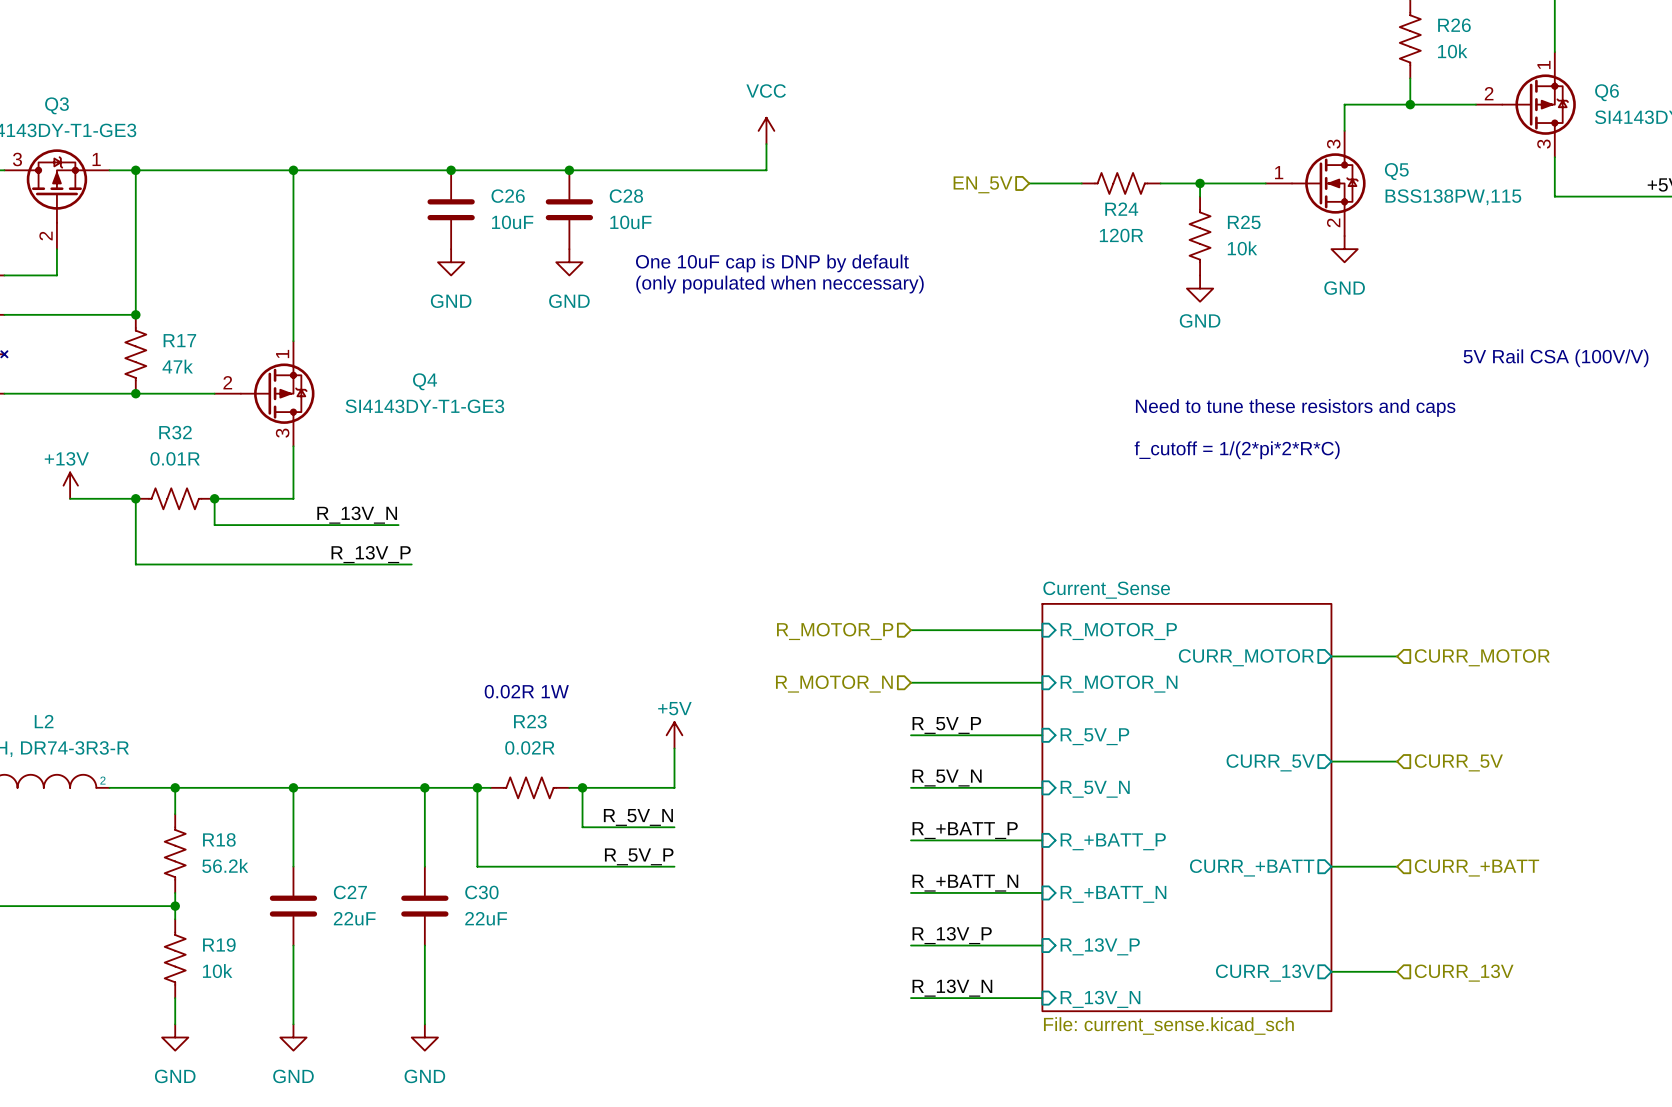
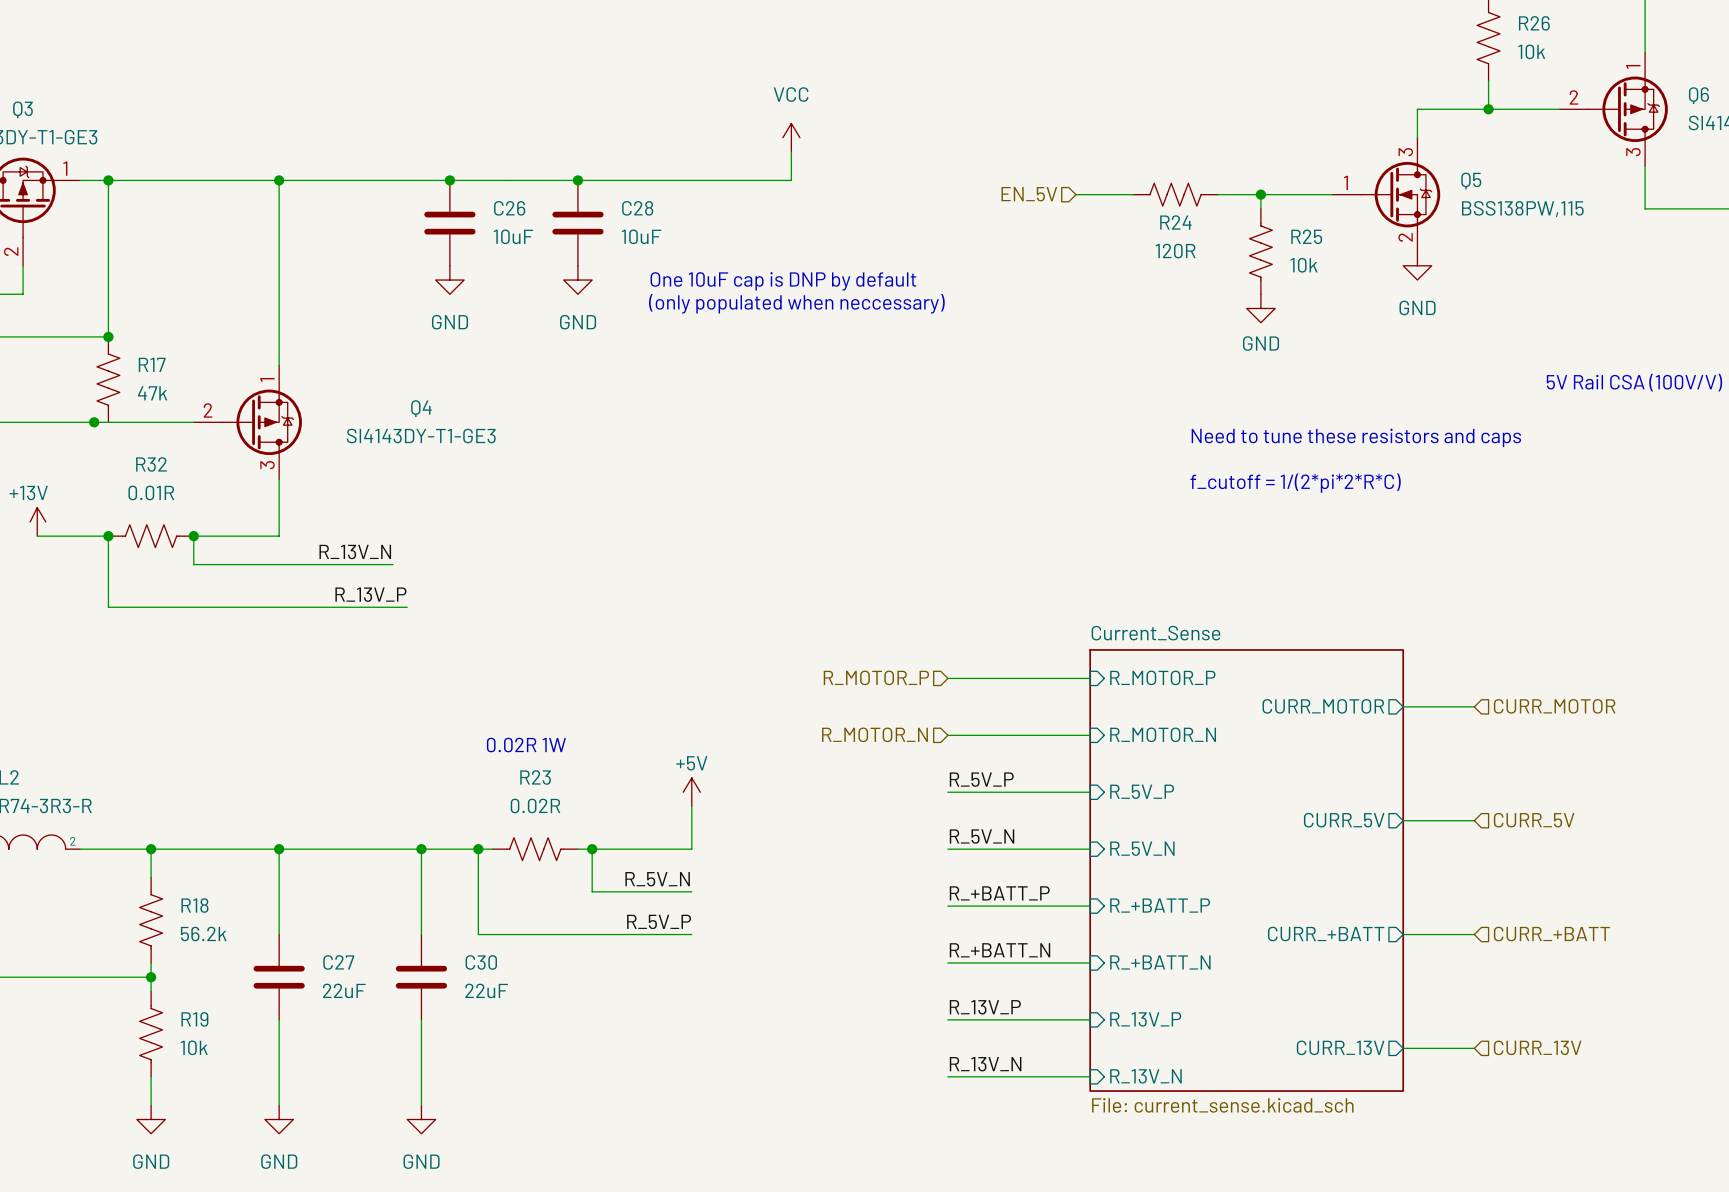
junction position: (135, 393) -> (94, 422)

